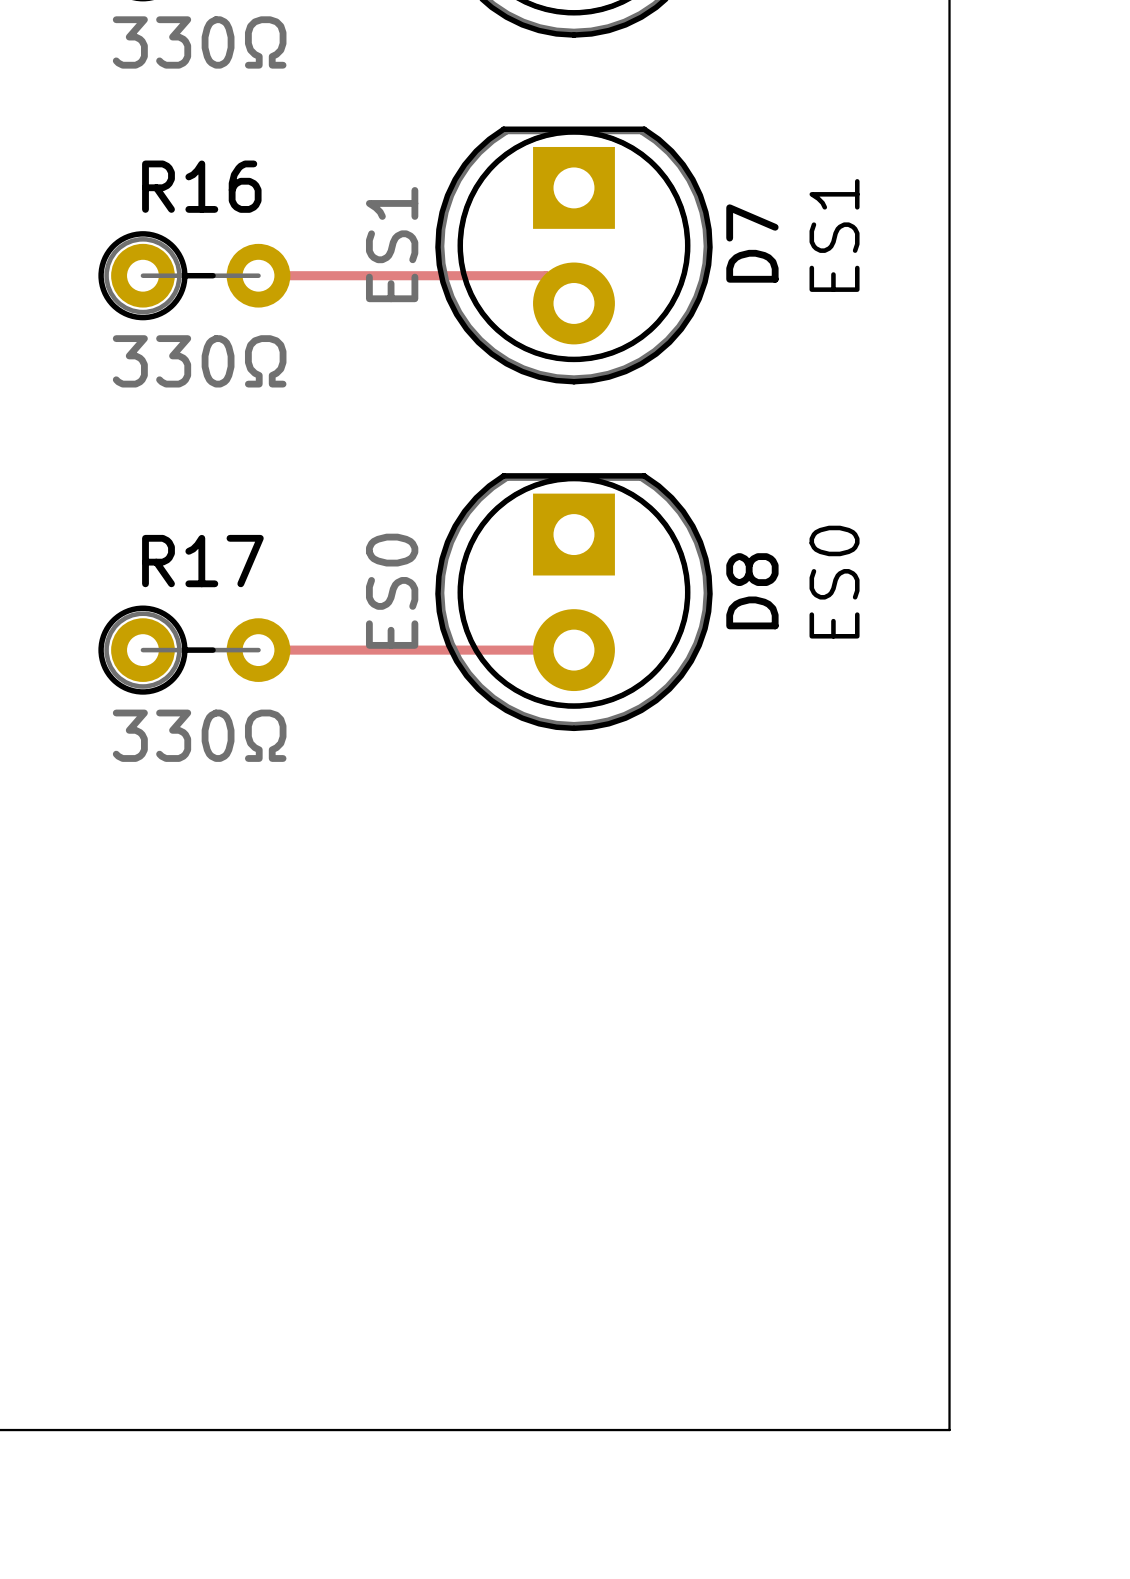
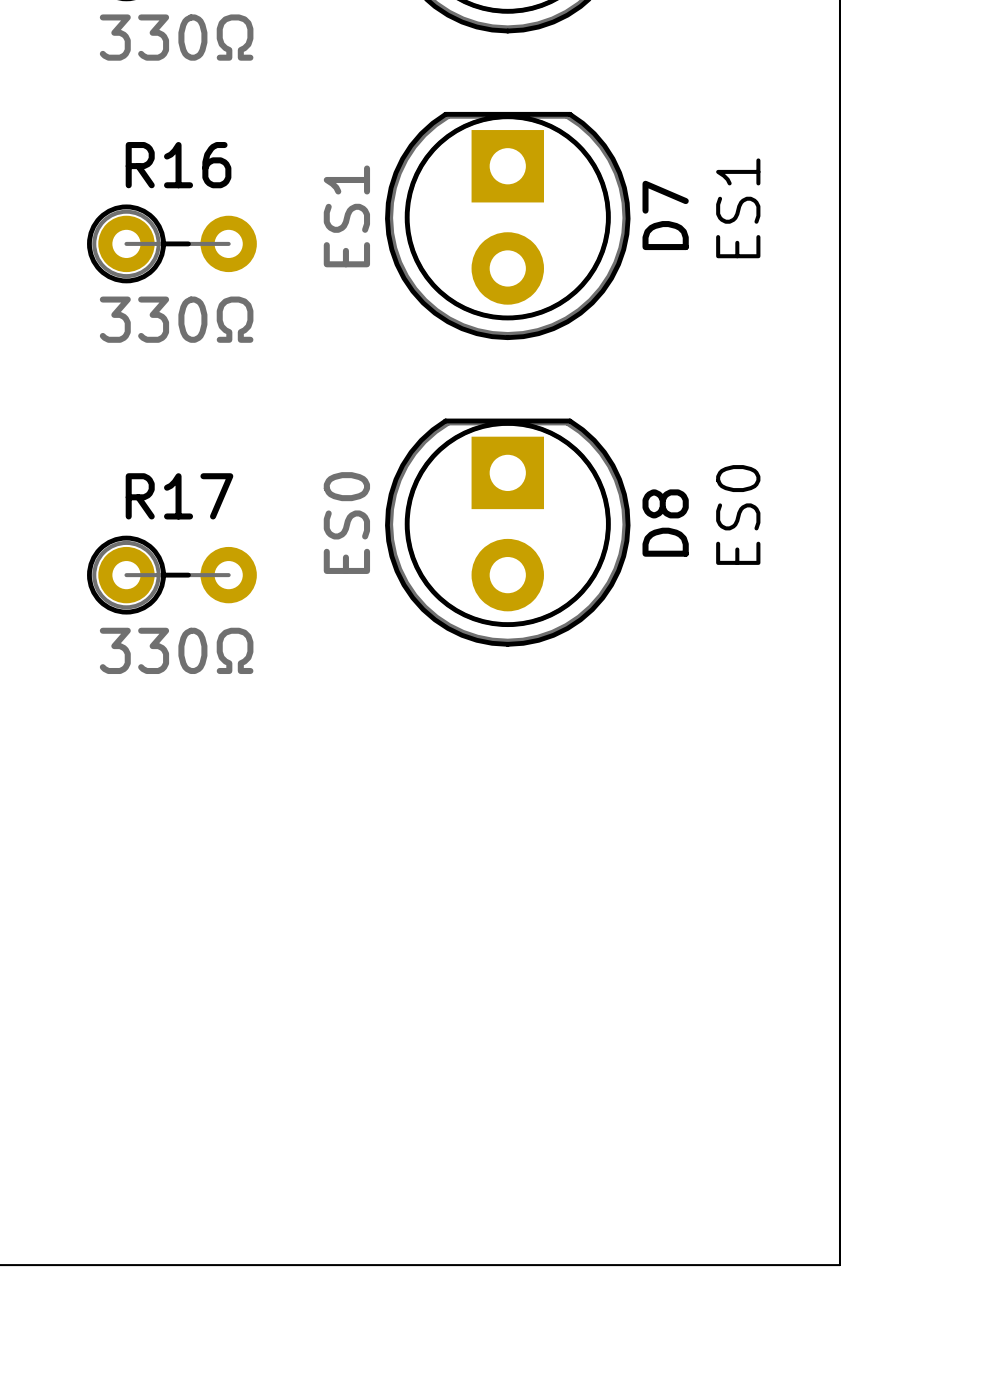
track: (258, 275) (546, 275) (573, 303) -> none
track: (258, 650) (573, 650) -> none

